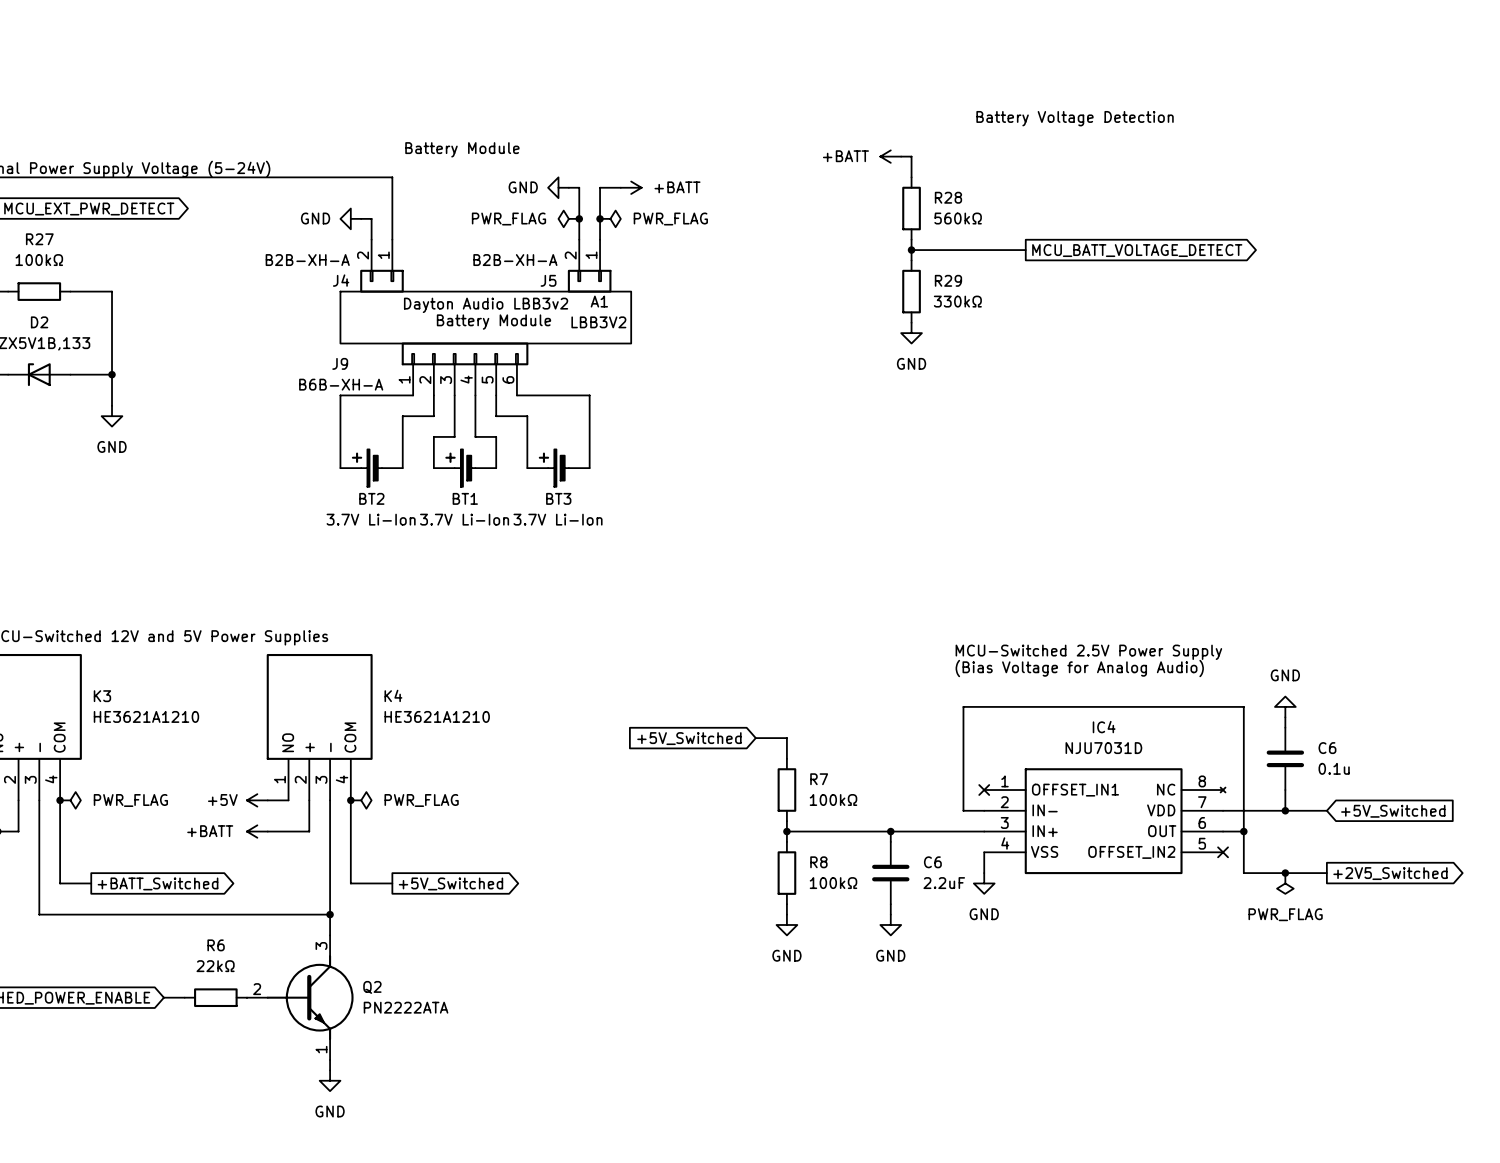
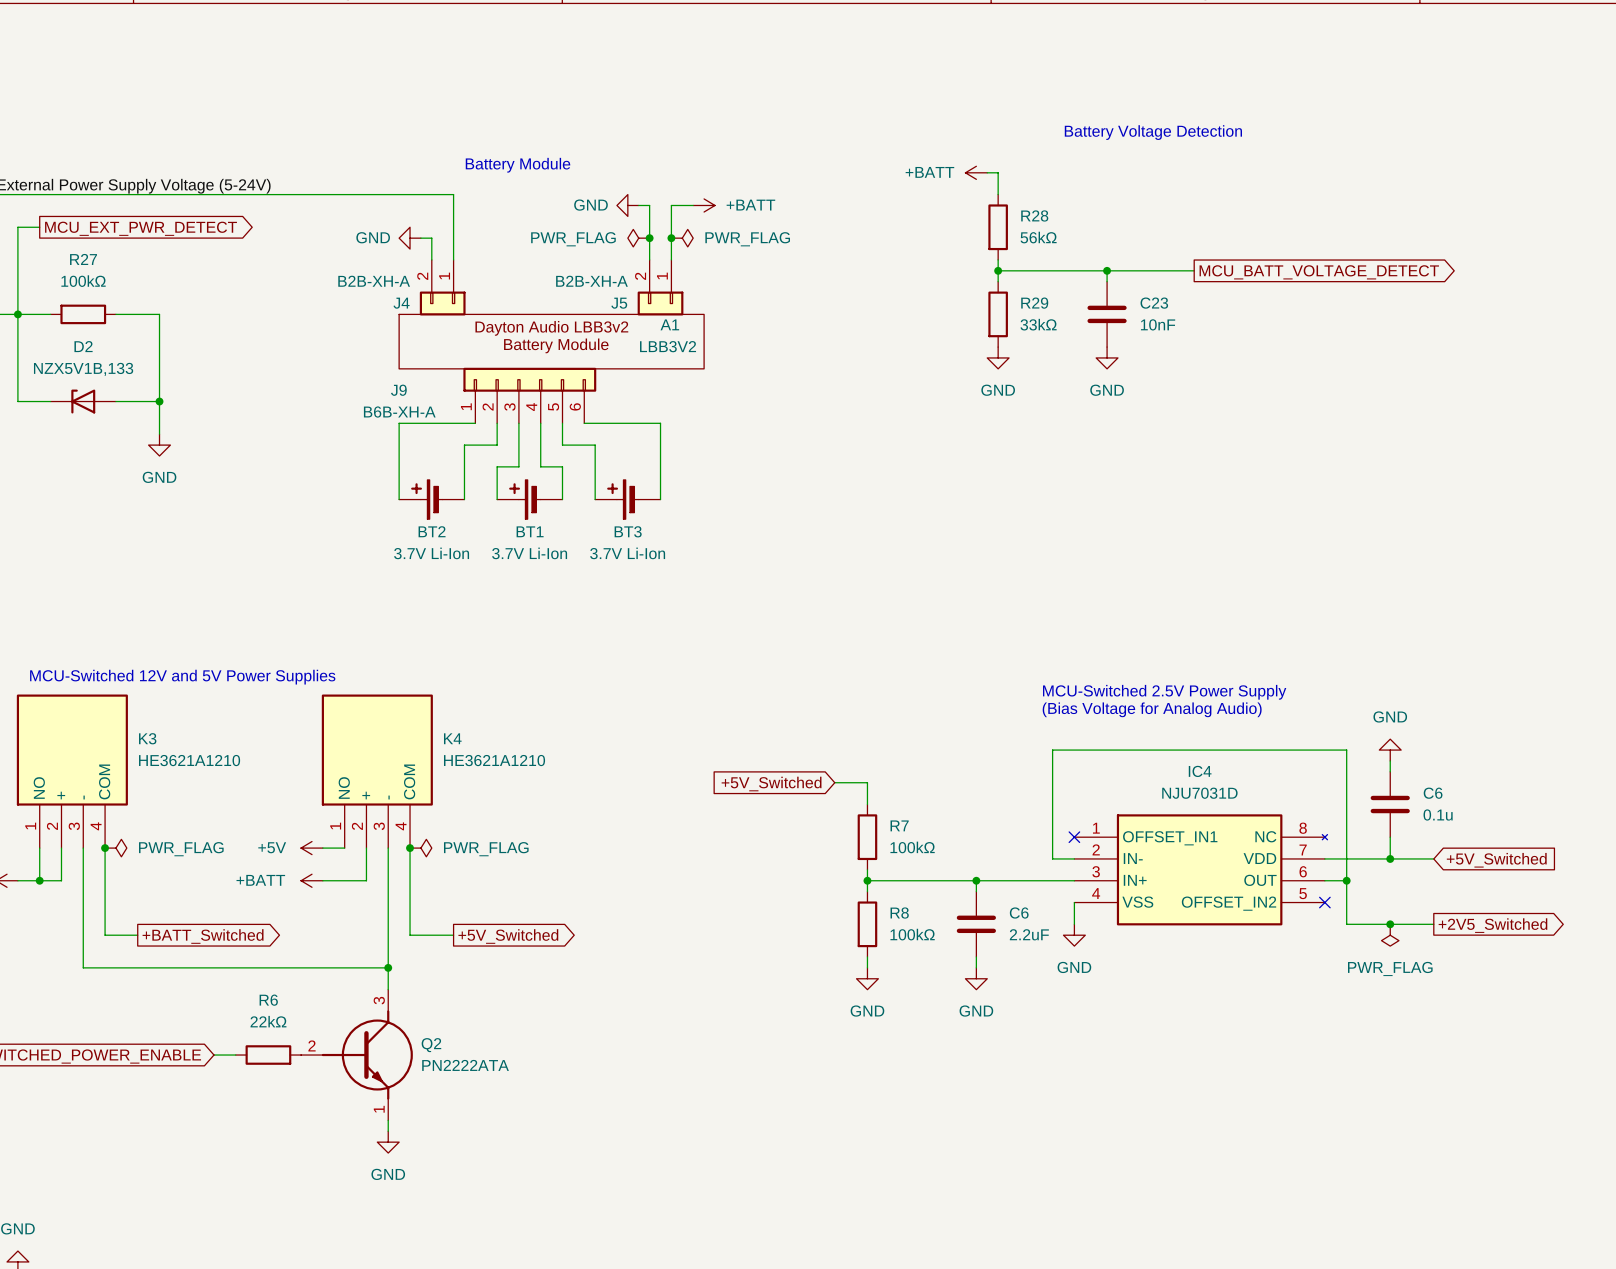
R28 value: 560kΩ (958, 218) -> 56kΩ (1038, 237)
wire: none -> (1107, 270) (1107, 281)
junction: none -> (1107, 270)
wire: none -> (1117, 270) (1194, 270)
global label position: MCU_BATT_VOLTAGE_DETECT (1137, 250) -> MCU_BATT_VOLTAGE_DETECT (1319, 272)
C23: none -> 10nF (1107, 314)
R29 value: 330kΩ (957, 301) -> 33kΩ (1038, 324)
power symbol: none -> GND (1107, 357)

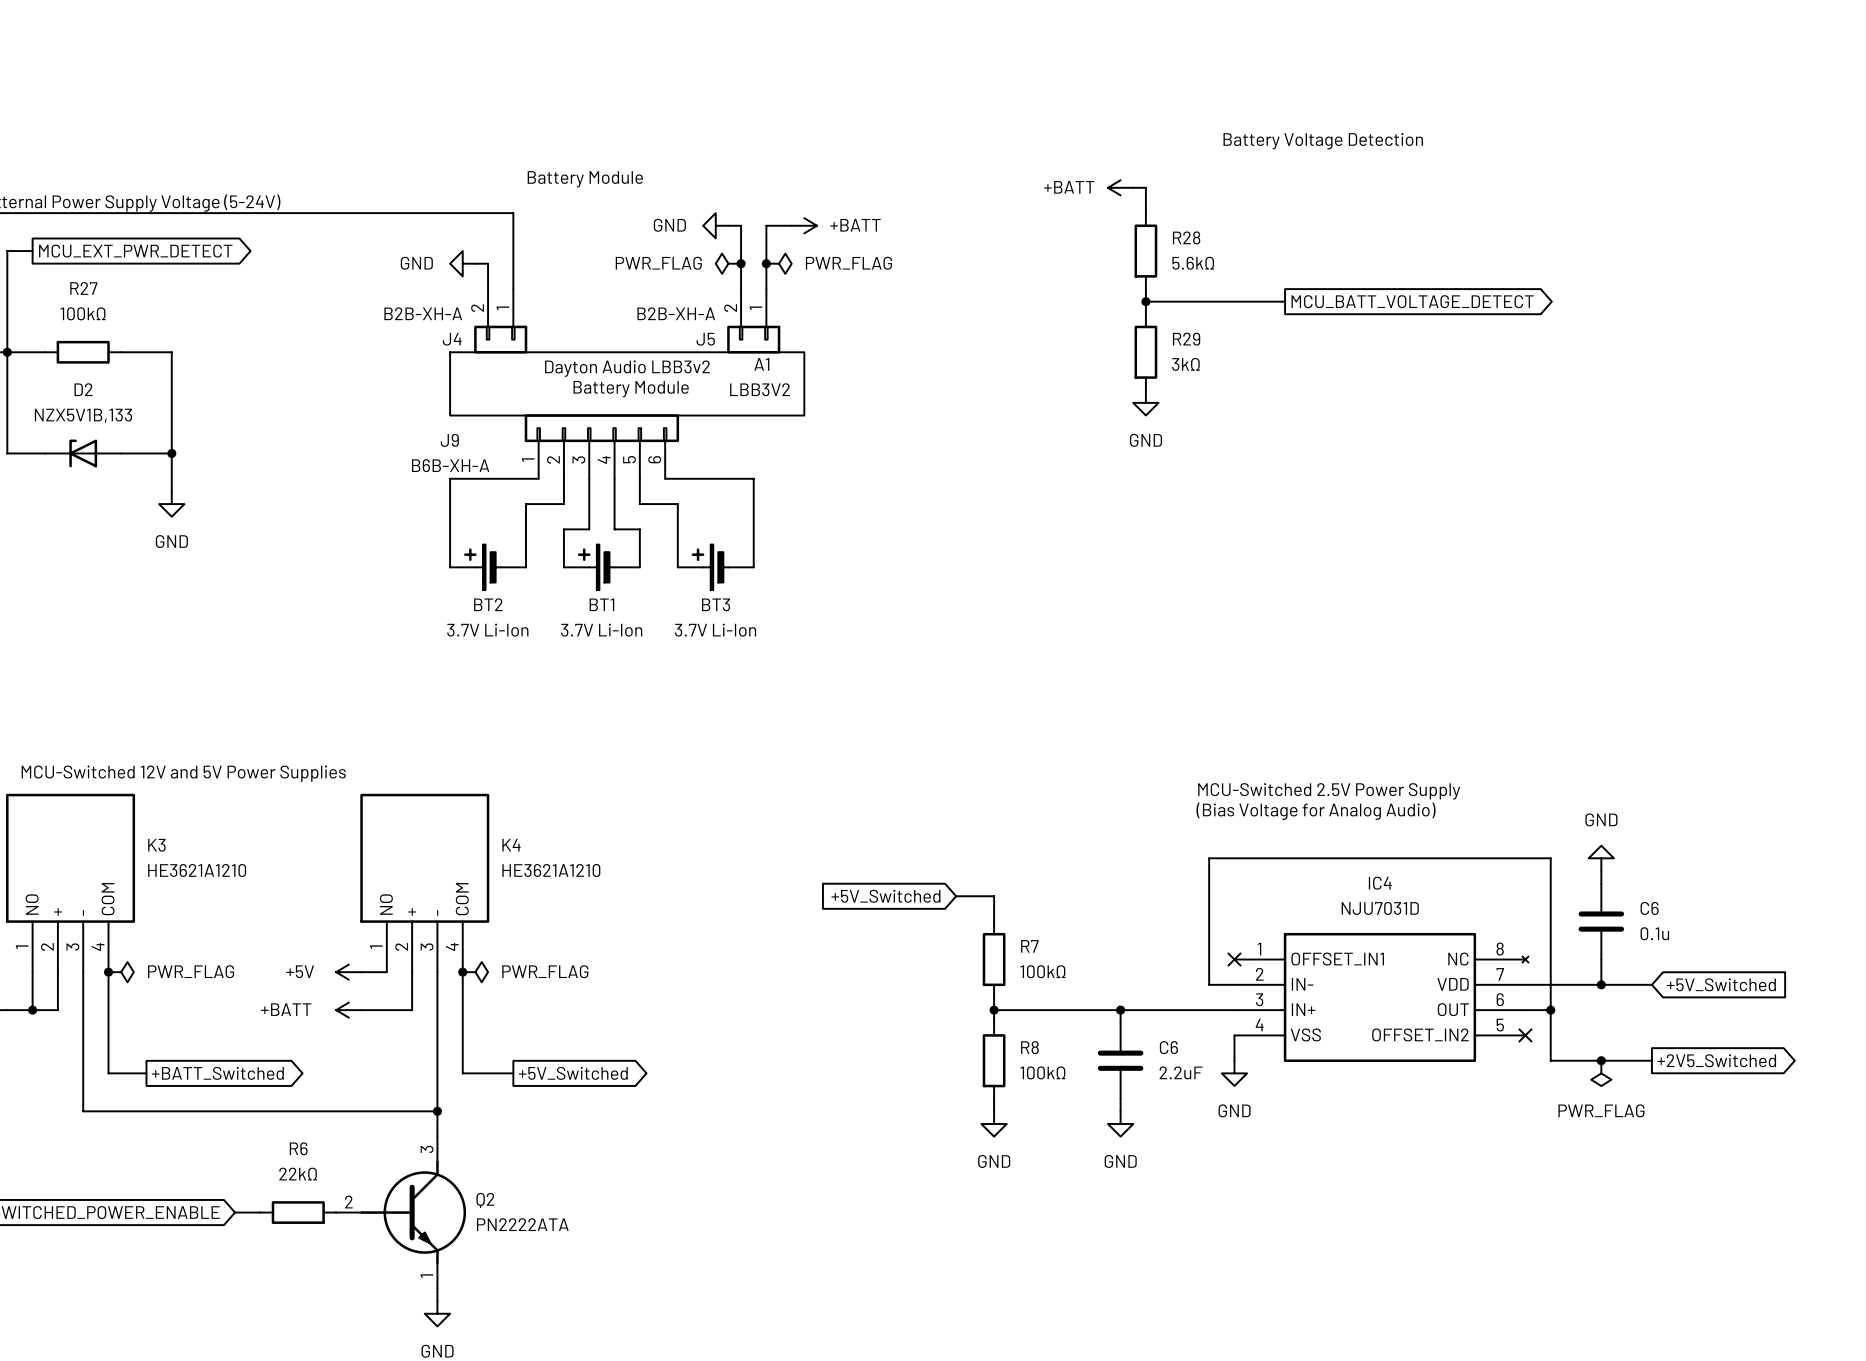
R28 value: 56kΩ (1038, 237) -> 5.6kΩ (1193, 263)
wire: (1107, 270) (1107, 281) -> none
junction: (1107, 270) -> none
wire: (1117, 270) (1194, 270) -> none
global label position: MCU_BATT_VOLTAGE_DETECT (1319, 272) -> MCU_BATT_VOLTAGE_DETECT (1412, 301)
C23: 10nF (1107, 314) -> none
R29 value: 33kΩ (1038, 324) -> 3kΩ (1185, 364)
power symbol: GND (1107, 357) -> none

